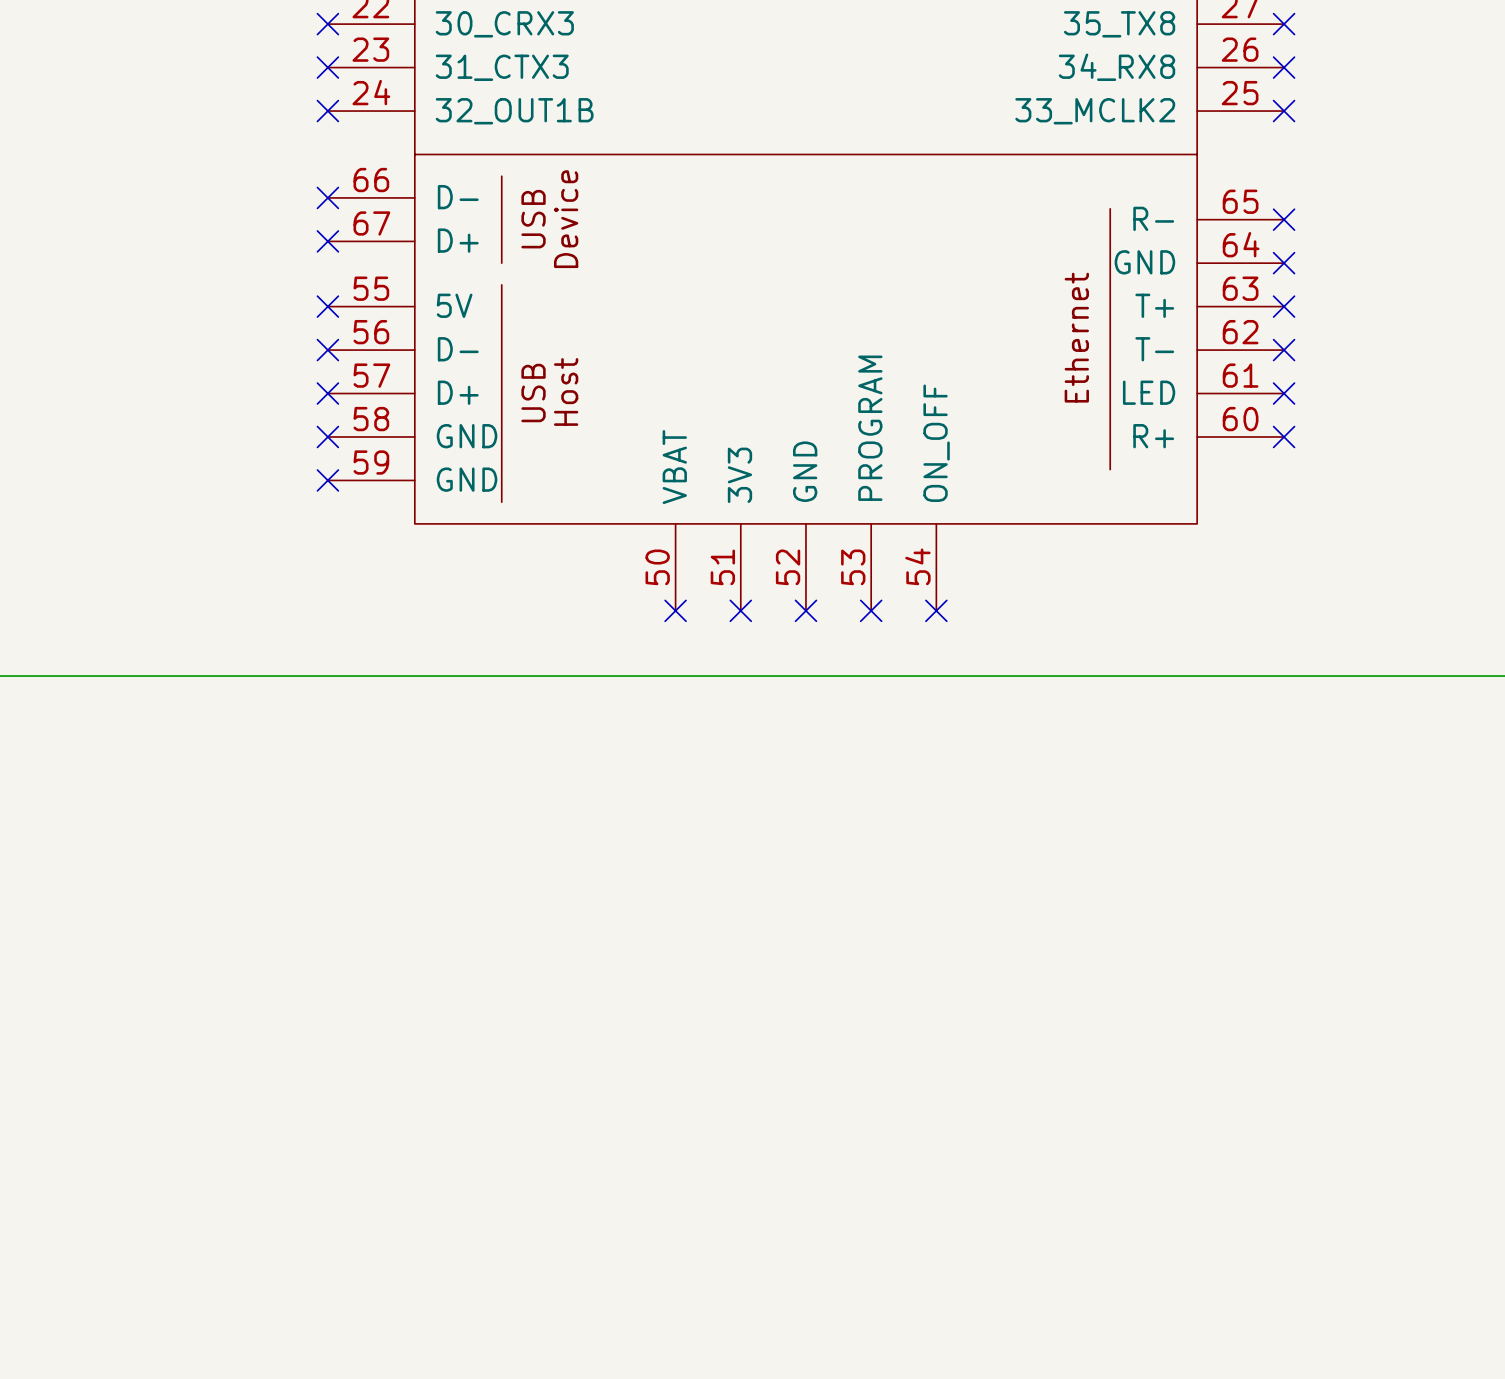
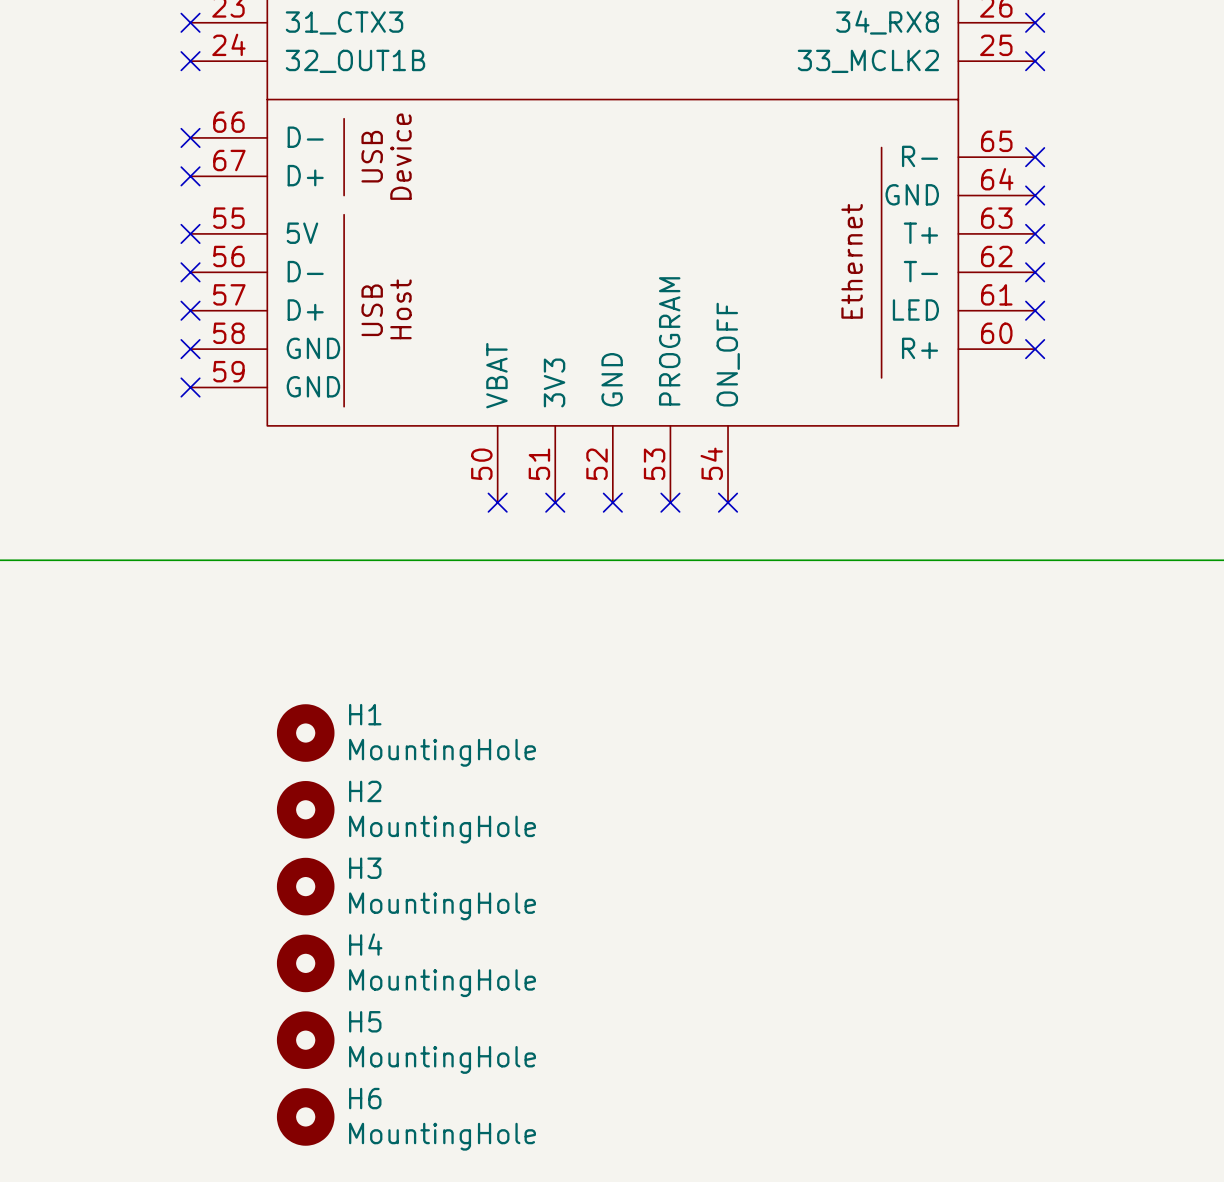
H1: none -> MountingHole (305, 733)
H2: none -> MountingHole (305, 809)
H3: none -> MountingHole (305, 886)
H4: none -> MountingHole (305, 963)
H5: none -> MountingHole (305, 1040)
H6: none -> MountingHole (305, 1116)

